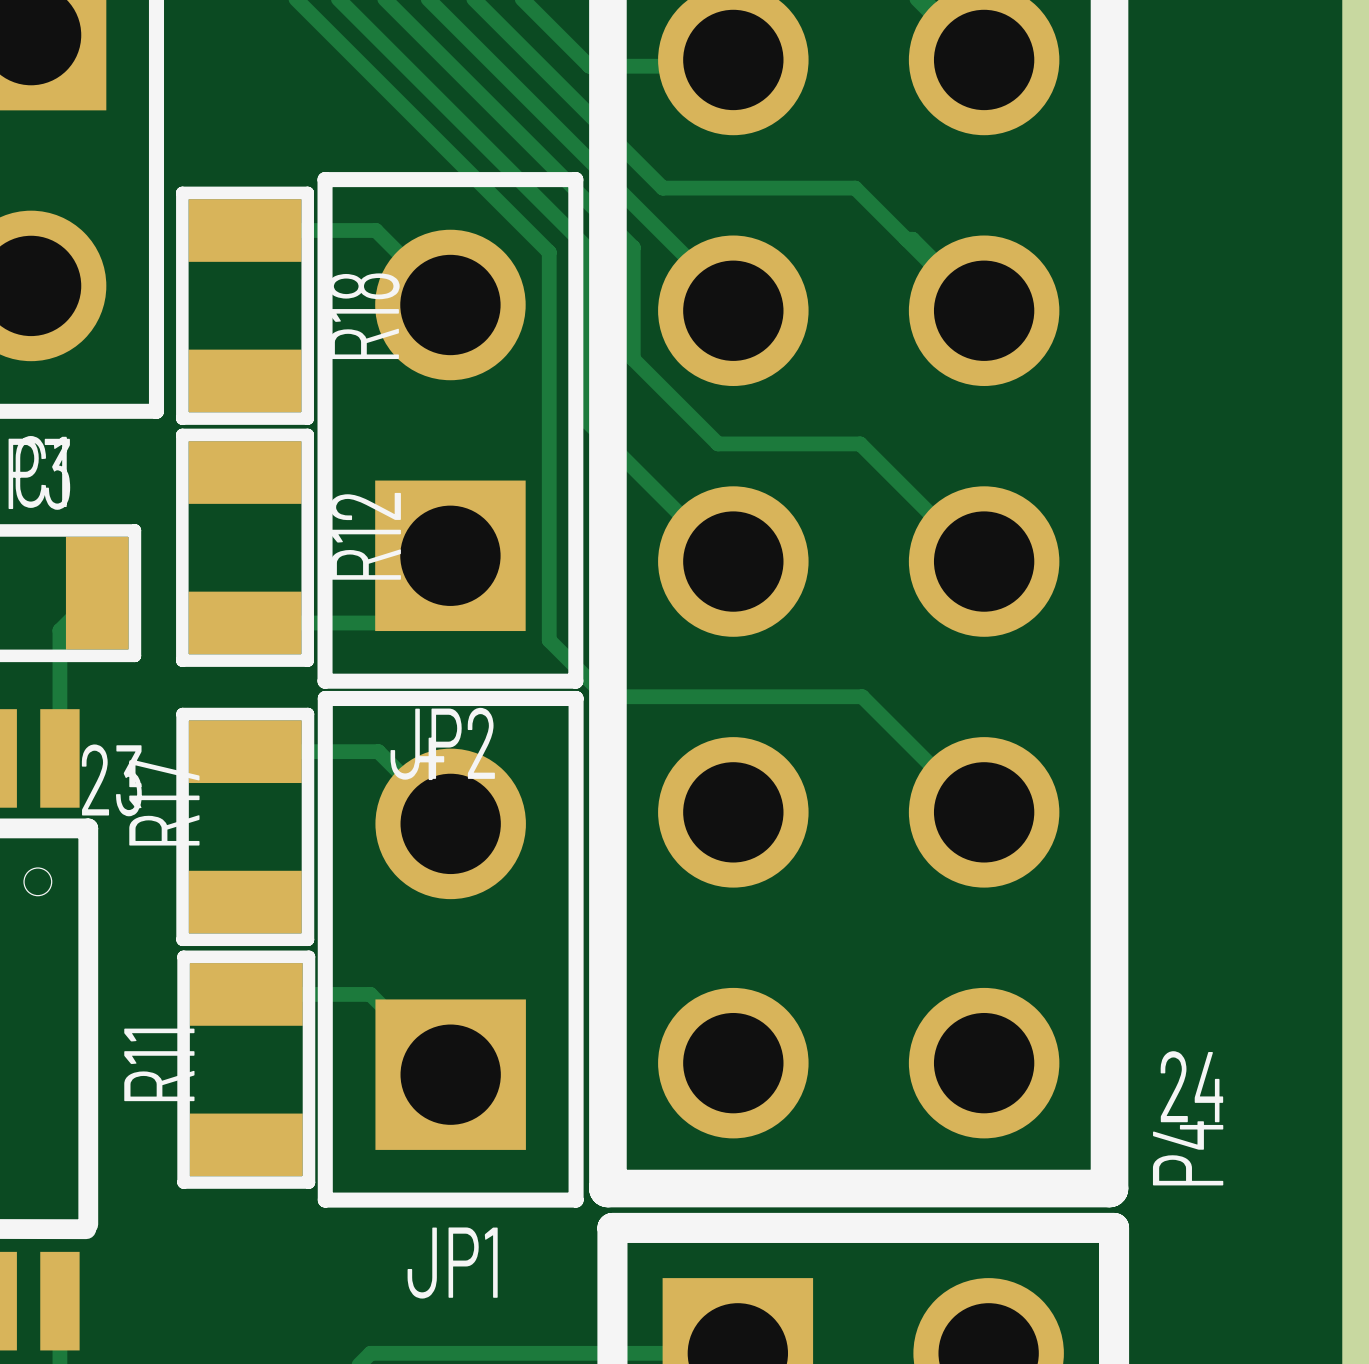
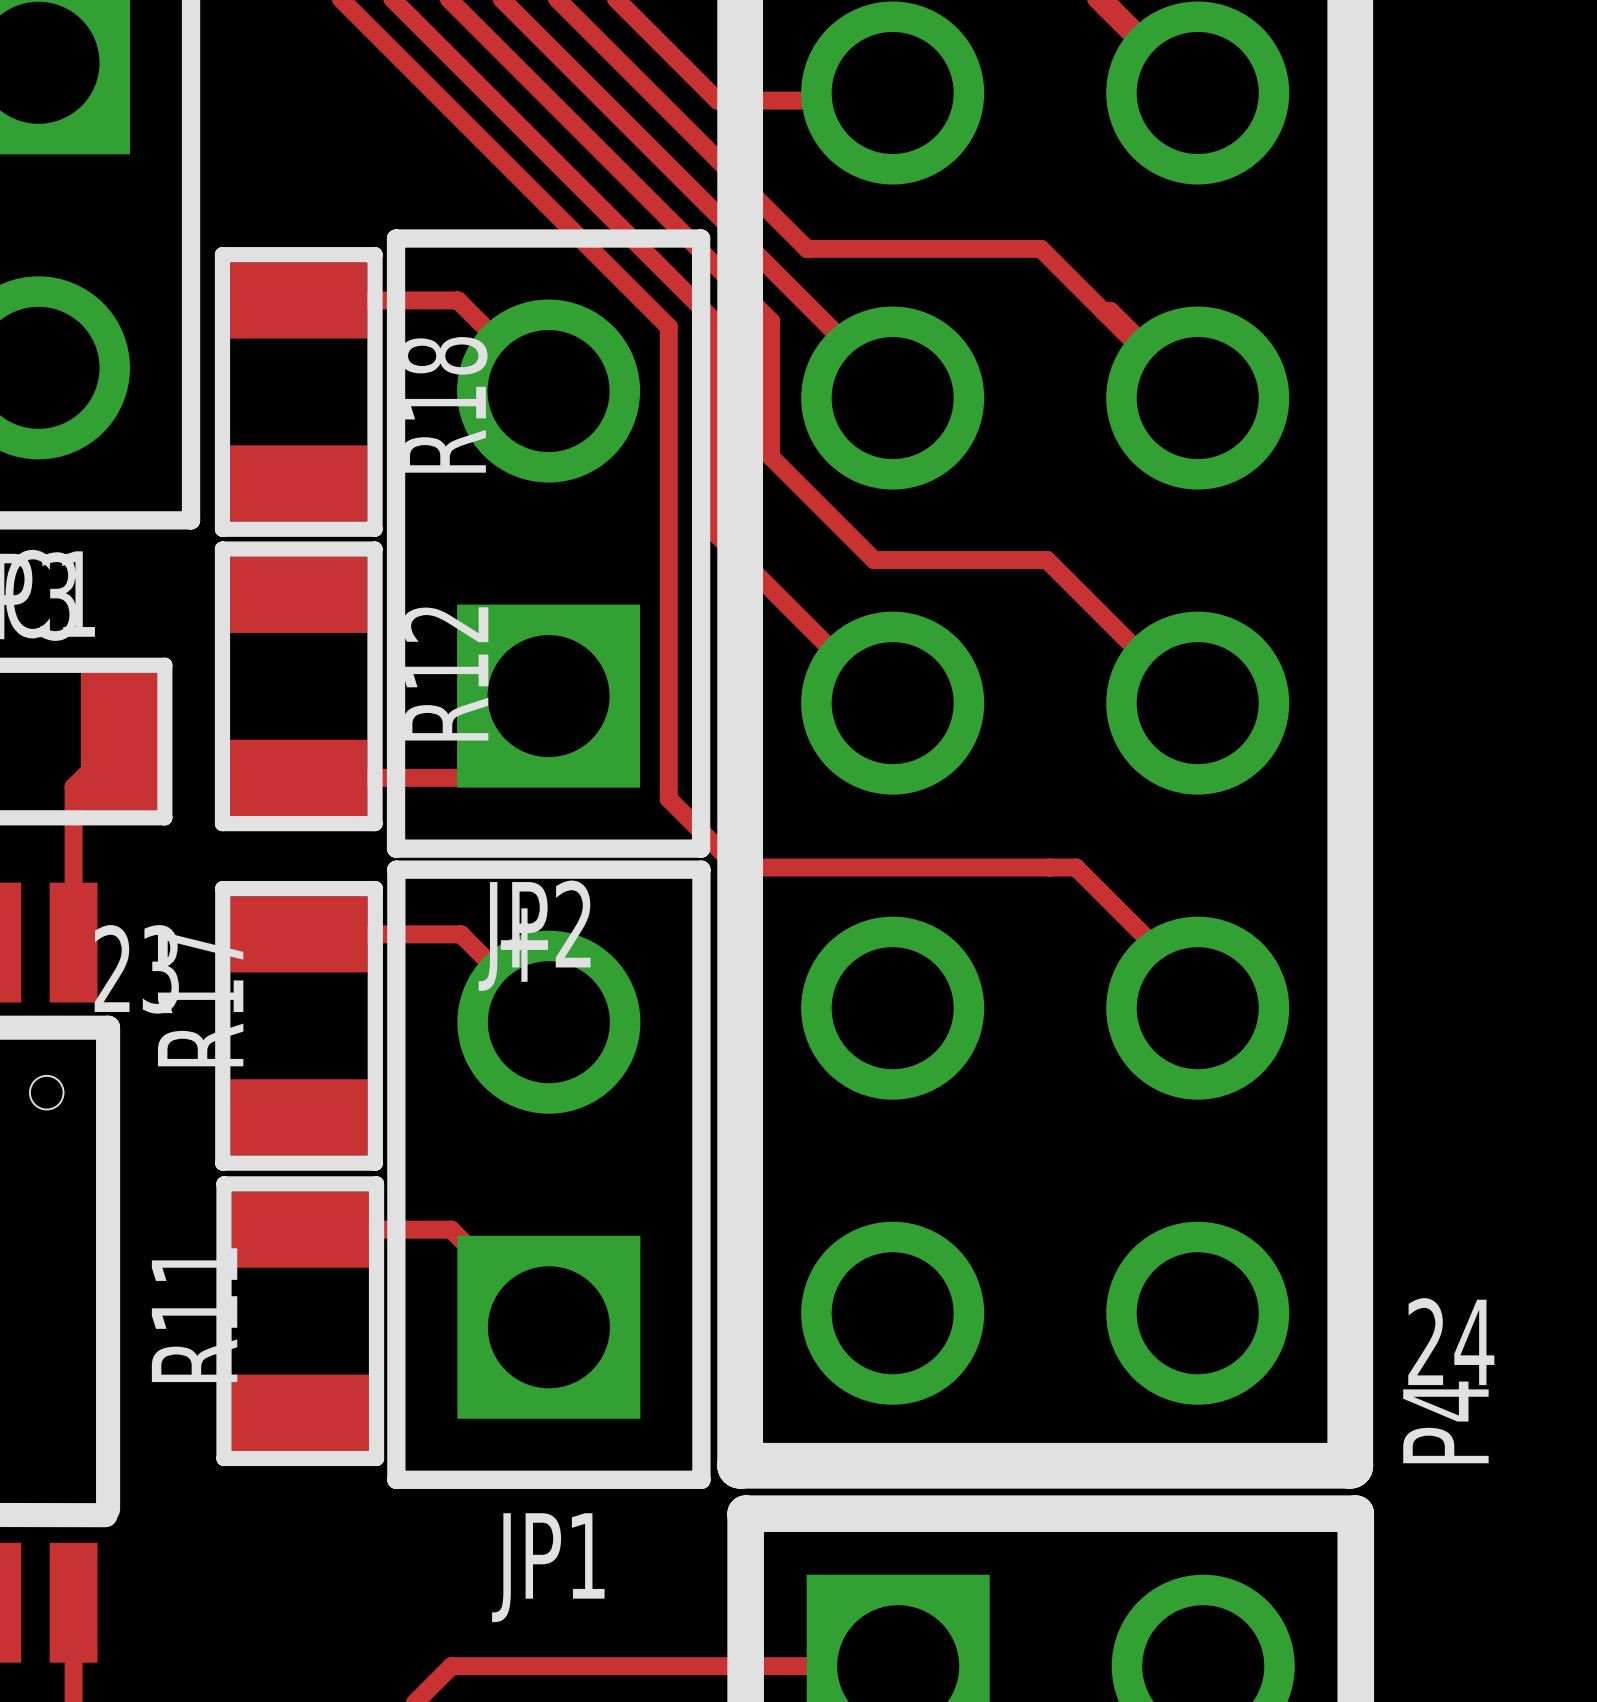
track: (862, 696) (984, 818) -> (1049, 867) (1076, 867) (1197, 989) (1197, 1008)

